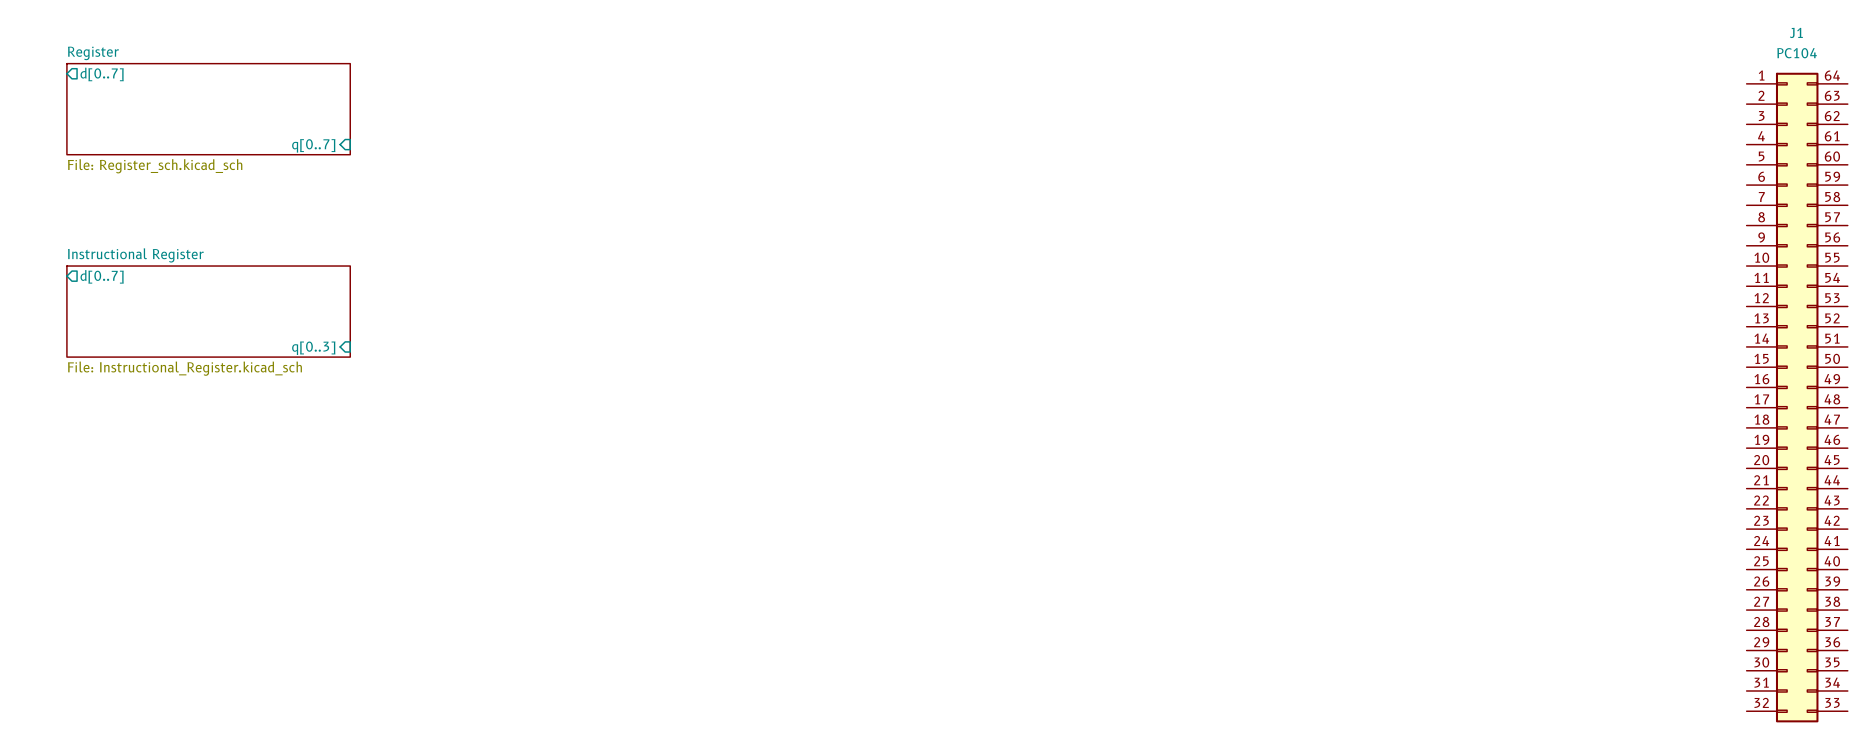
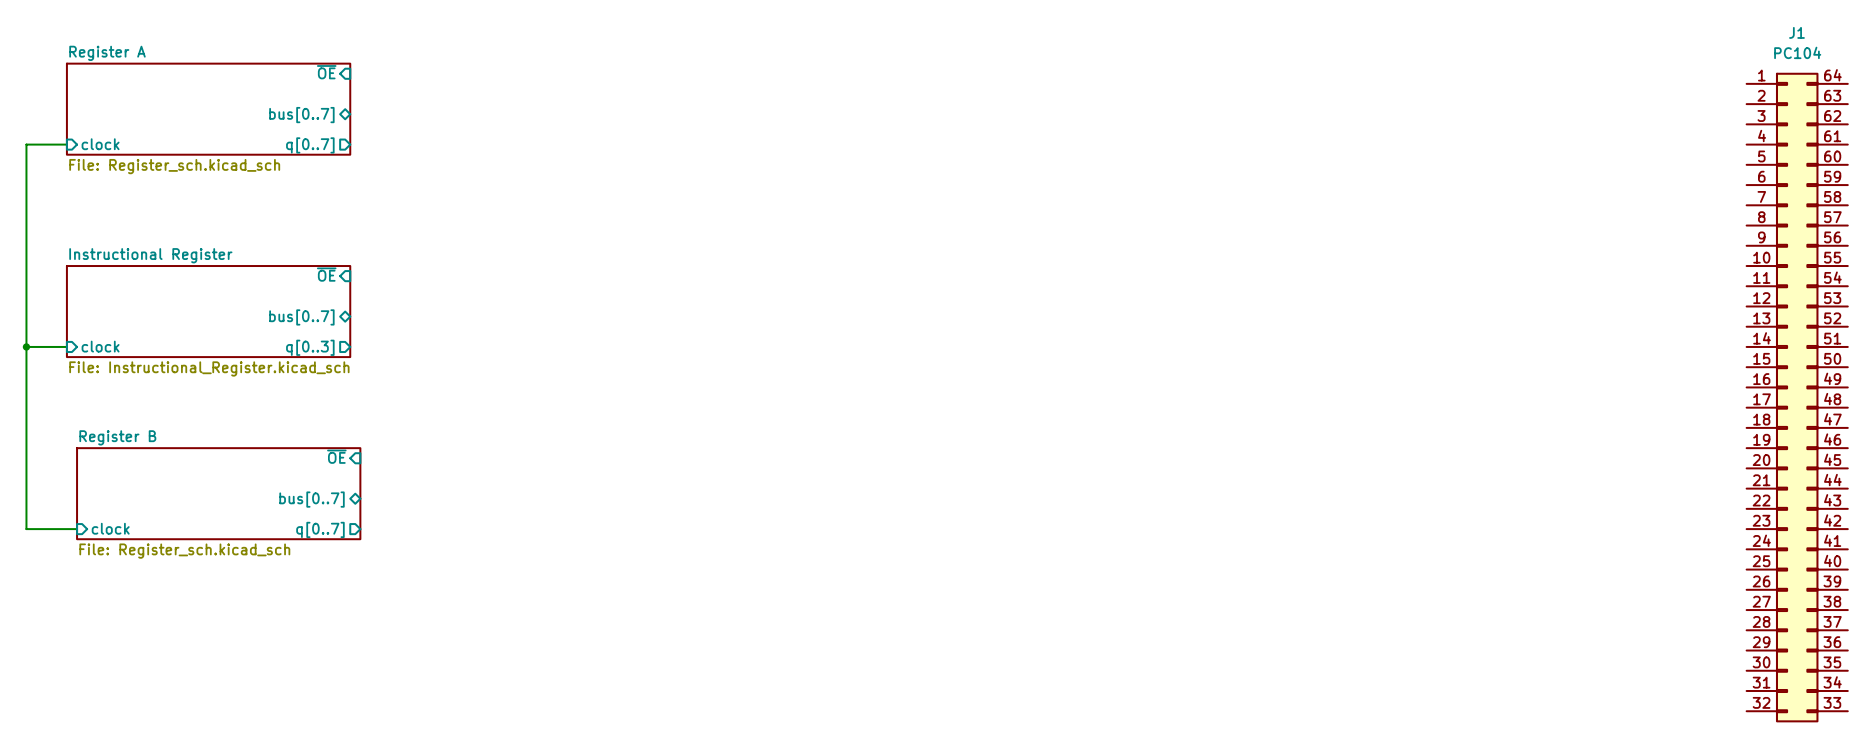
sheet Register name: Register (93, 53) -> Register A (107, 53)
sheet pin: none -> ~{OE} (326, 72)
sheet pin: d[0..7] (102, 74) -> none
sheet pin: none -> bus[0..7] (301, 115)
sheet pin: none -> clock (100, 144)
wire: none -> (66, 144) (26, 144) (26, 529) (77, 529)
sheet pin shape: input (313, 145) -> output (310, 145)
sheet pin: none -> ~{OE} (326, 274)
sheet pin: d[0..7] (102, 276) -> none
sheet pin: none -> bus[0..7] (301, 317)
wire: none -> (26, 346) (66, 346)
junction: none -> (26, 346)
sheet pin: none -> clock (100, 346)
sheet pin shape: input (313, 348) -> output (310, 347)
sheet pin: none -> ~{OE} (336, 456)
sheet Register B: none -> File: Register_sch.kicad_sch (218, 493)
sheet pin: none -> bus[0..7] (312, 499)
sheet pin: none -> clock (110, 528)
sheet pin: none -> q[0..7] (320, 529)

